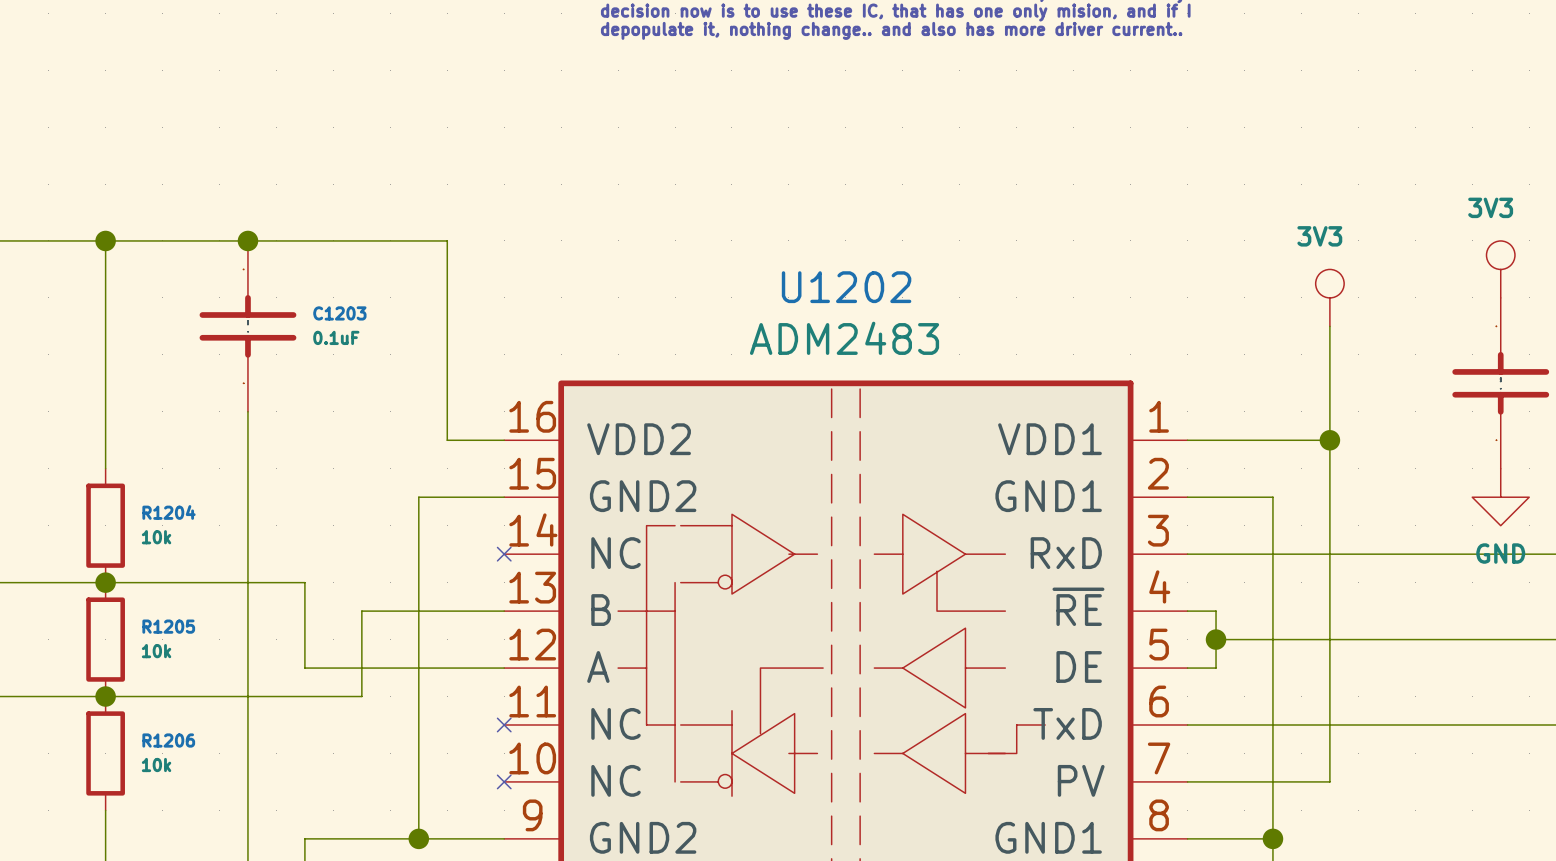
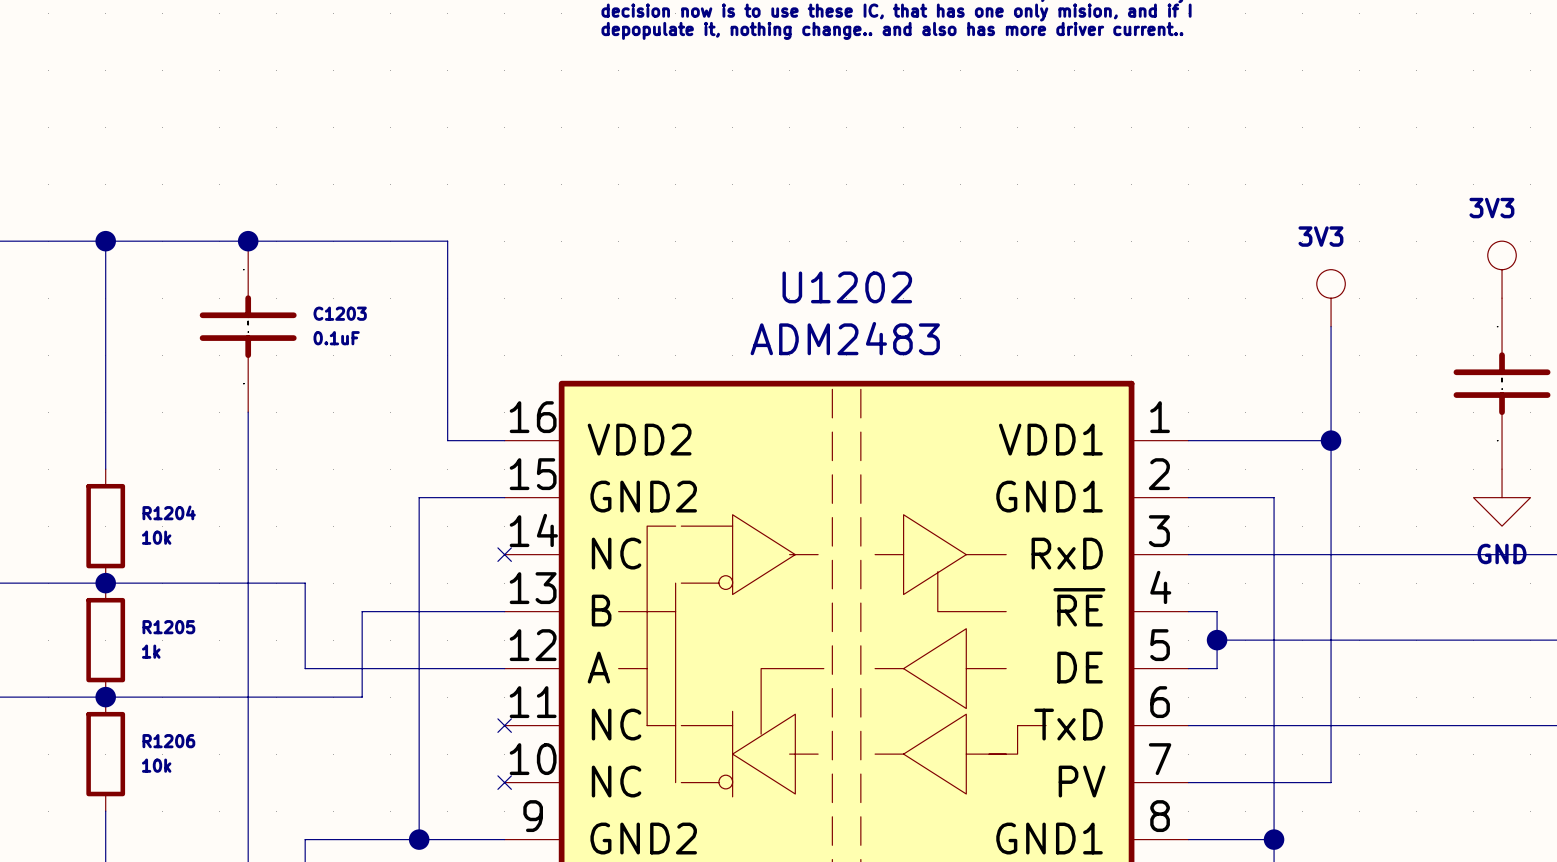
R1205 value: 10k (156, 651) -> 1k (151, 651)

